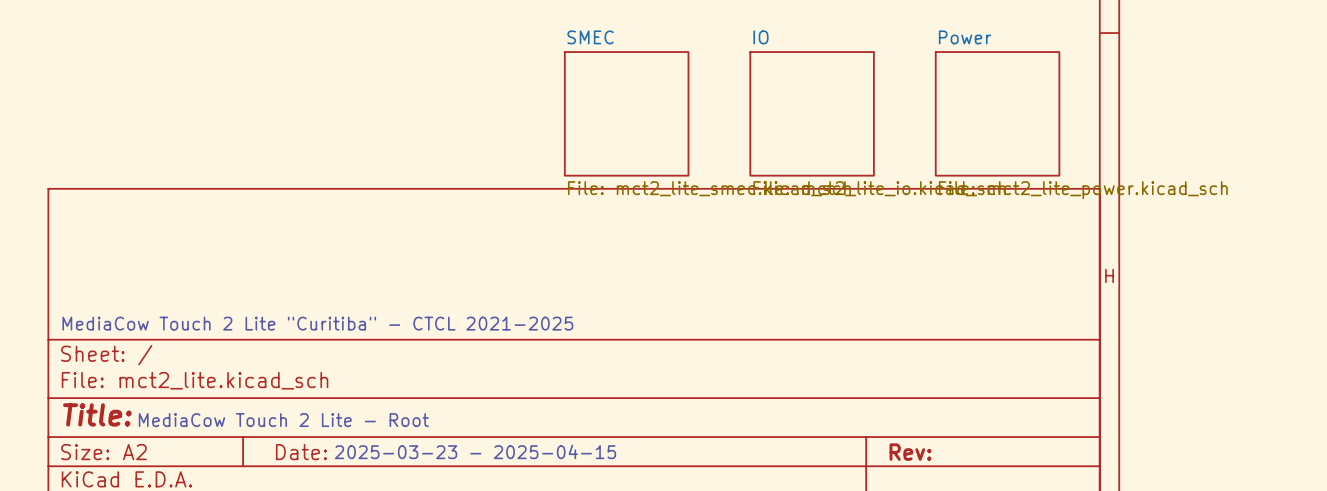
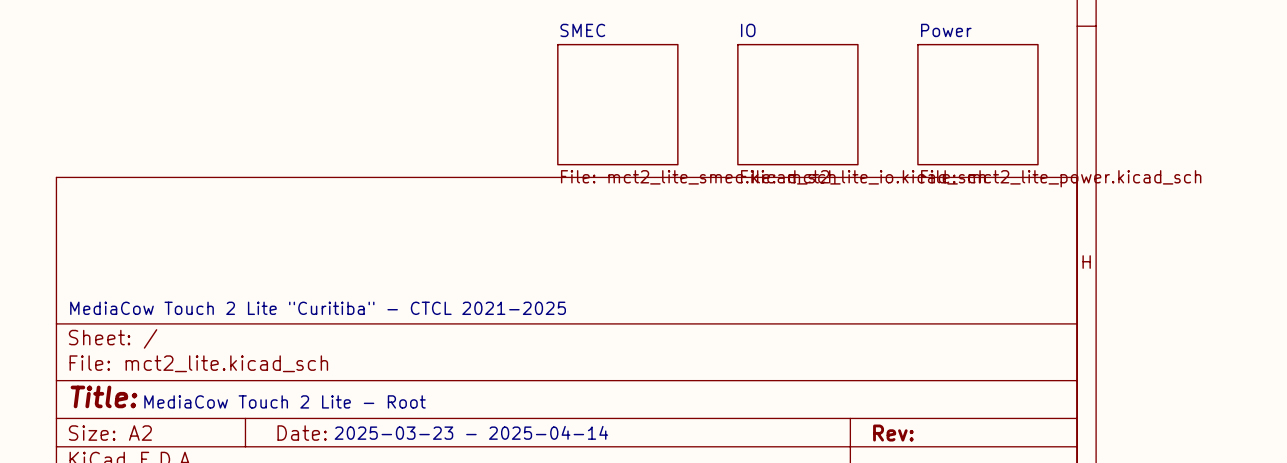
text: 2025-03-23 - 2025-04-15 (475, 451) -> 2025-03-23 - 2025-04-14 (471, 432)

